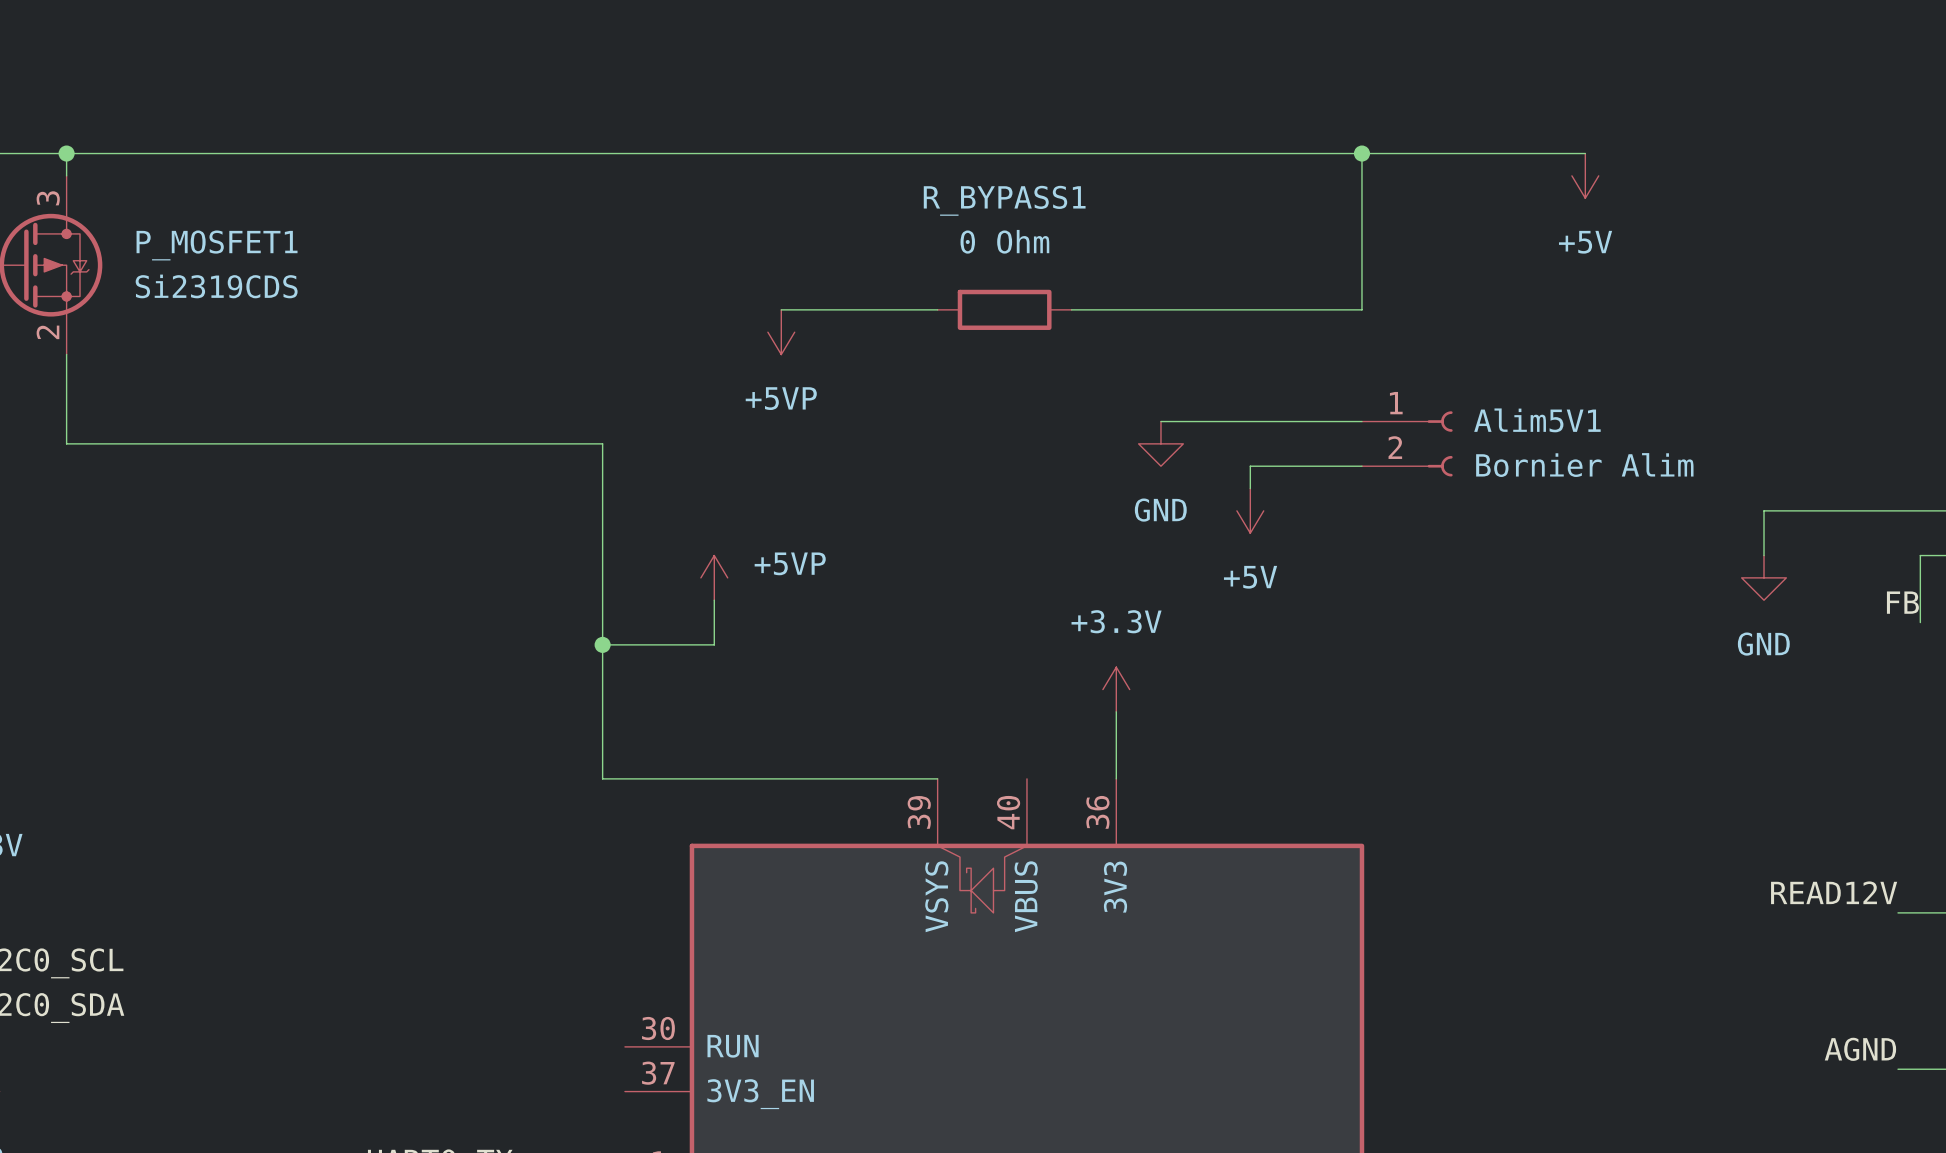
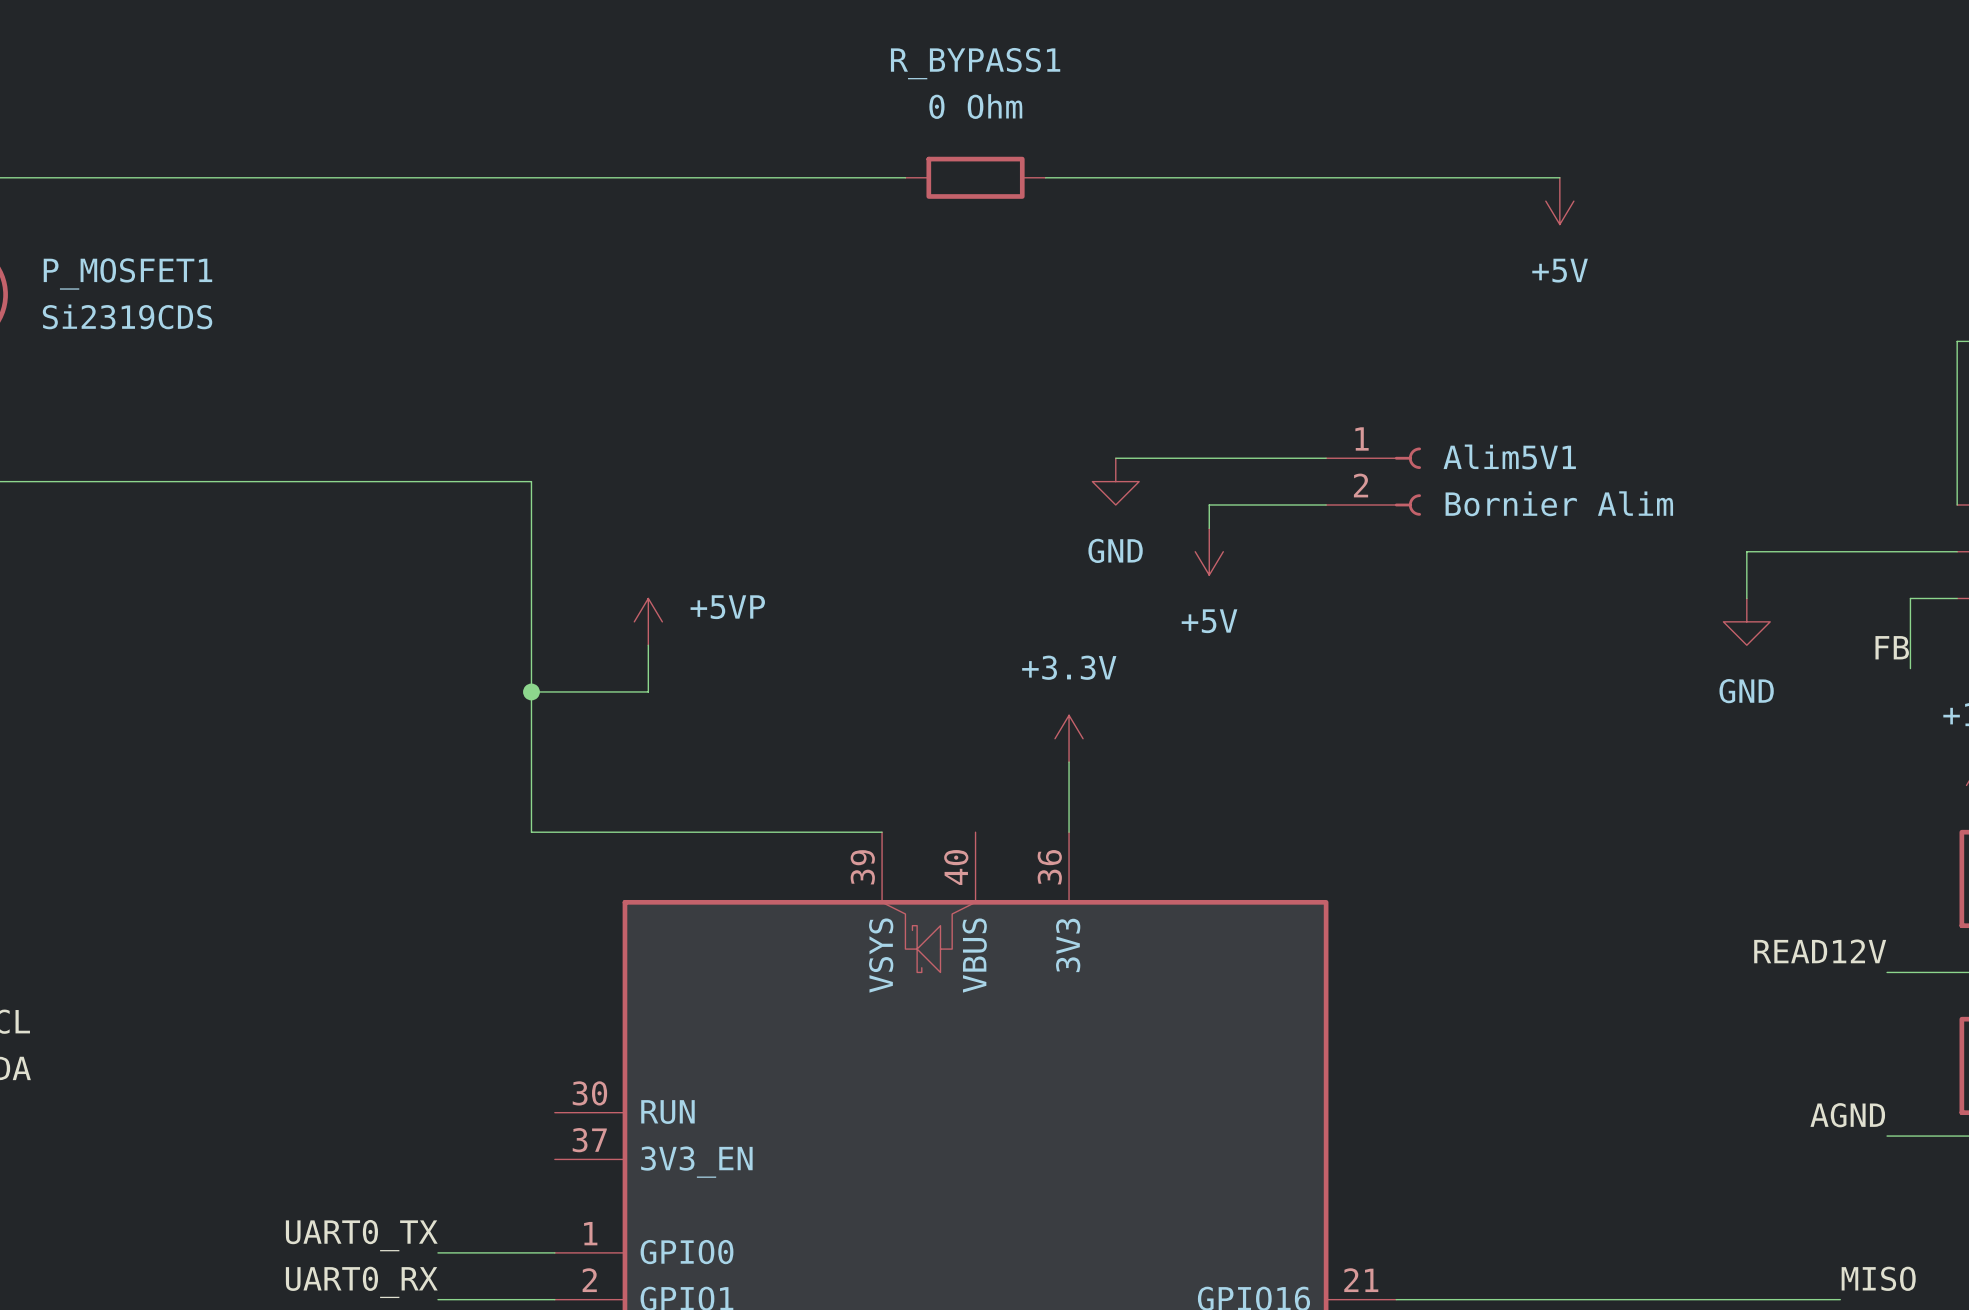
wire: (959, 153) (1093, 153) -> none
wire: (1361, 153) (1361, 309) (1071, 309) -> none
junction: (1361, 153) -> none
wire: (781, 309) (937, 309) -> none
R_BYPASS1 position: (1004, 309) -> (975, 177)
power symbol: +5VP (781, 332) -> none

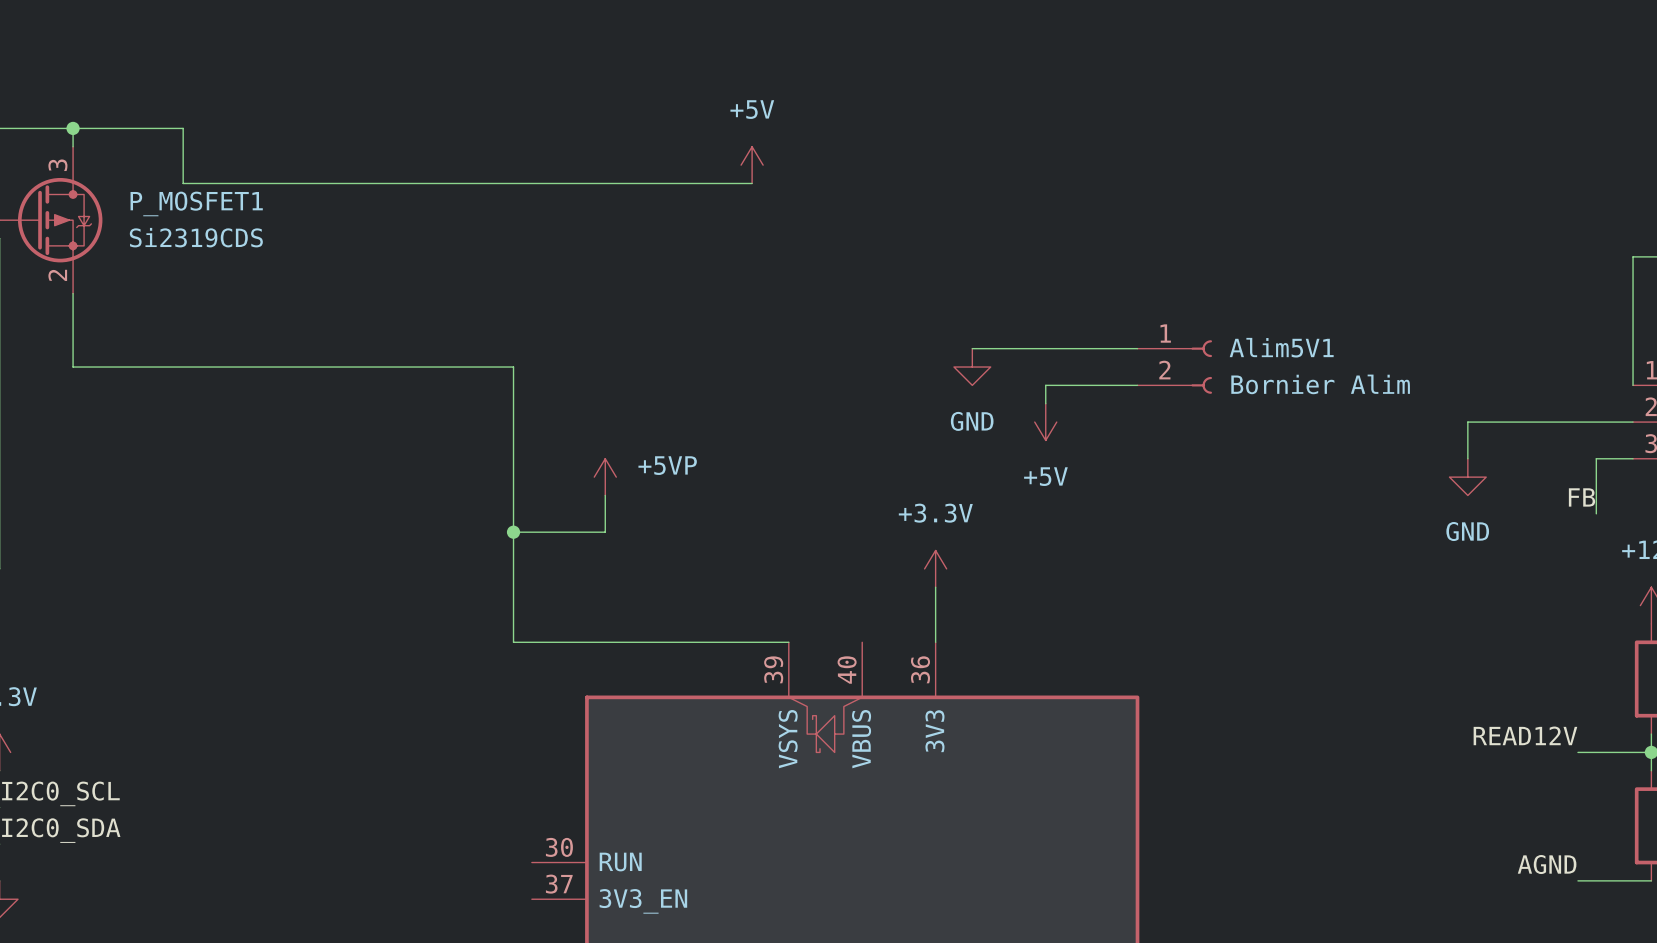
wire: (110, 177) (905, 177) -> (183, 128) (183, 183) (752, 183)
R_BYPASS1: 0 Ohm (975, 177) -> none
wire: (1045, 177) (1559, 177) -> none
power symbol: +5V (1559, 201) -> none
power symbol: none -> +5V (752, 165)

